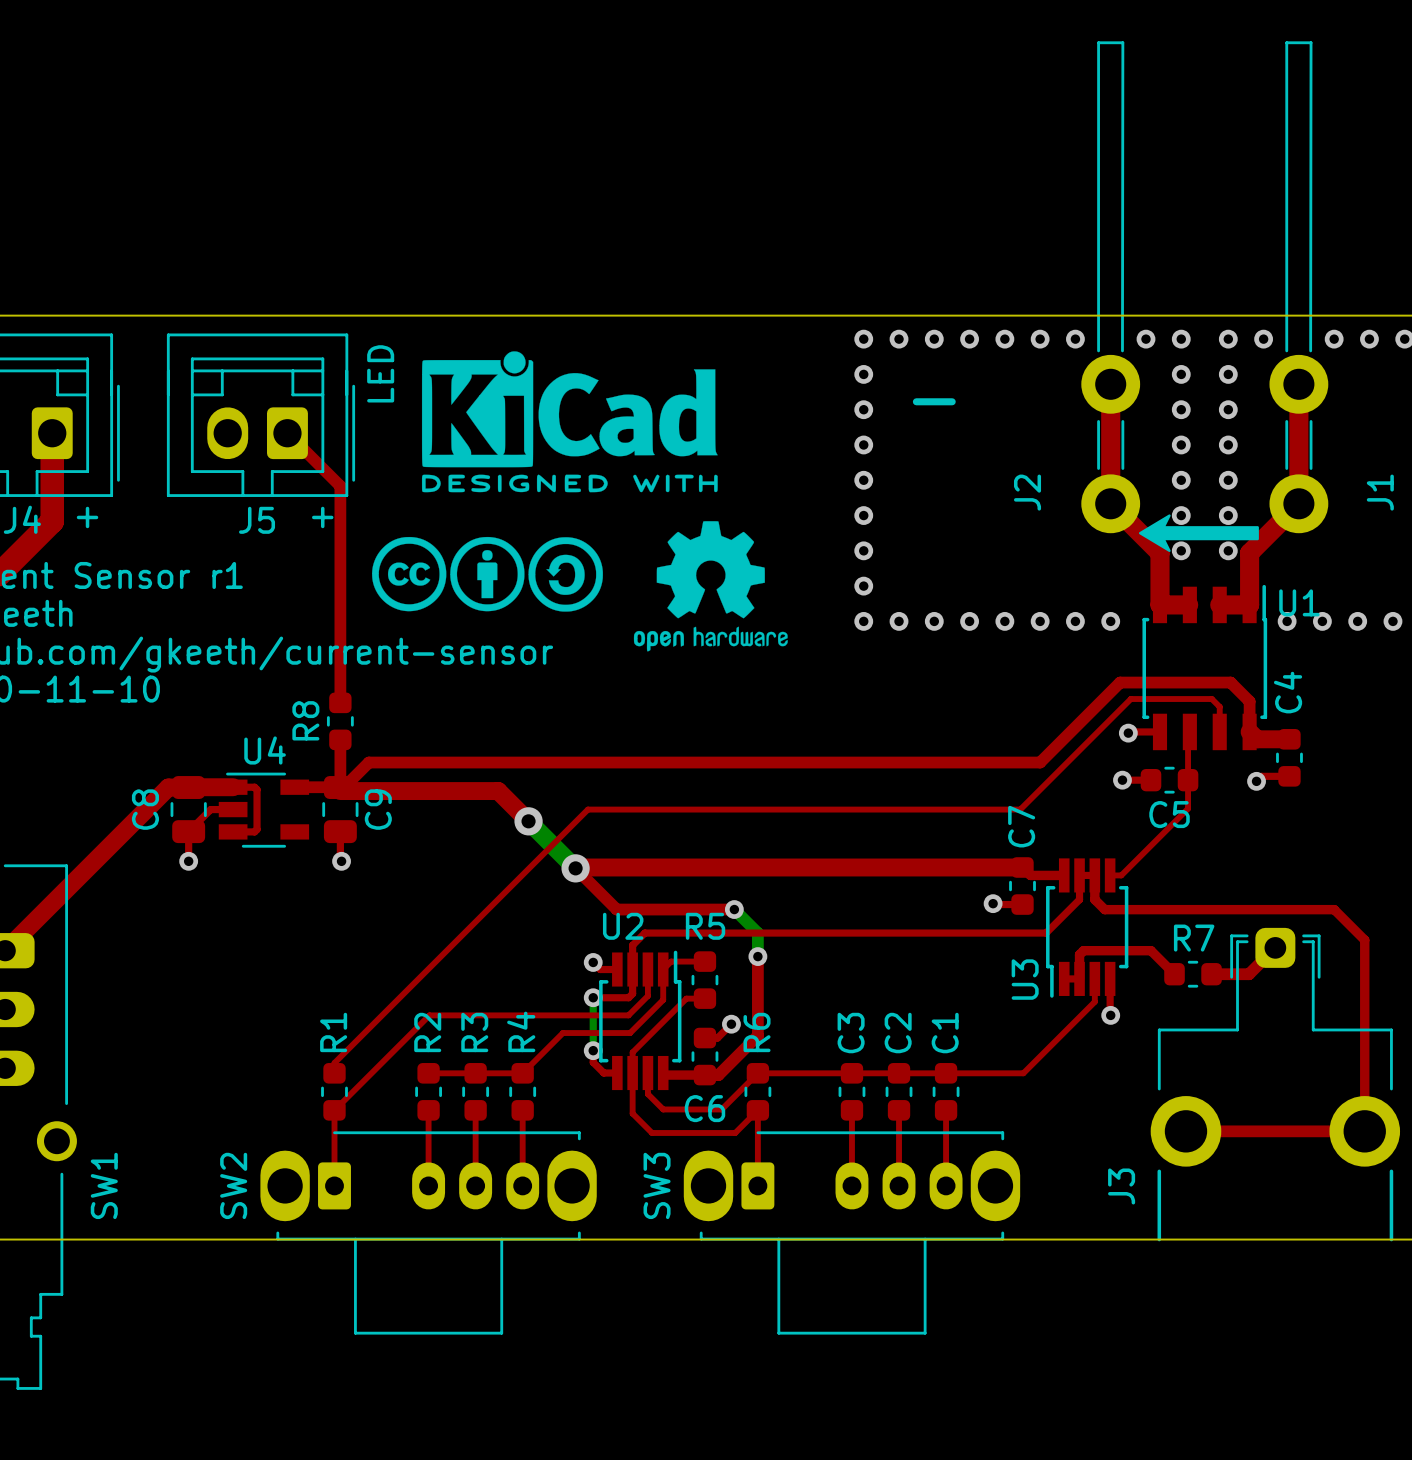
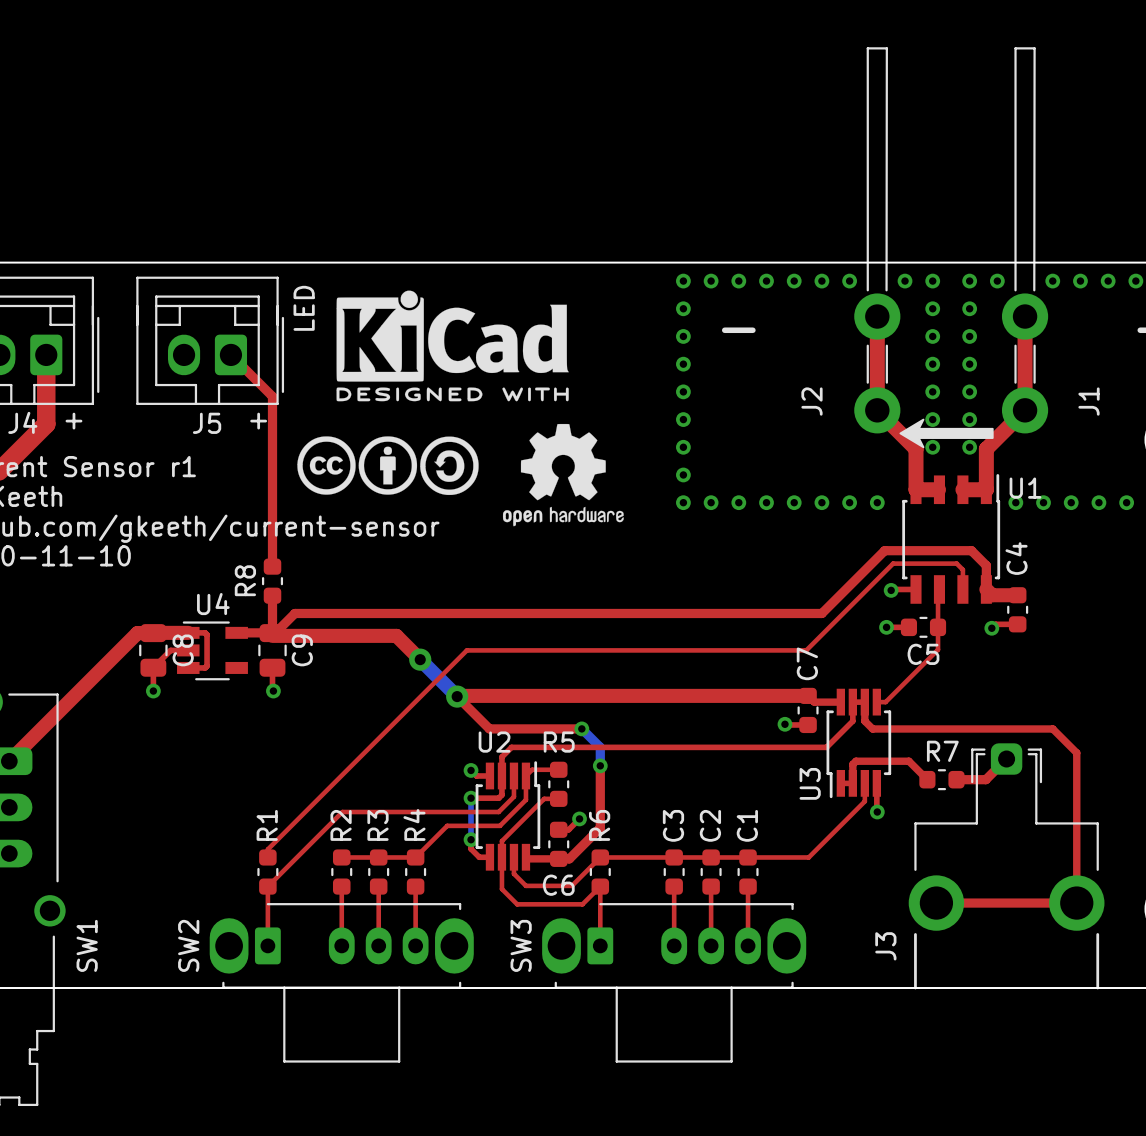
C8 name position: C8 (145, 809) -> C8 (183, 650)

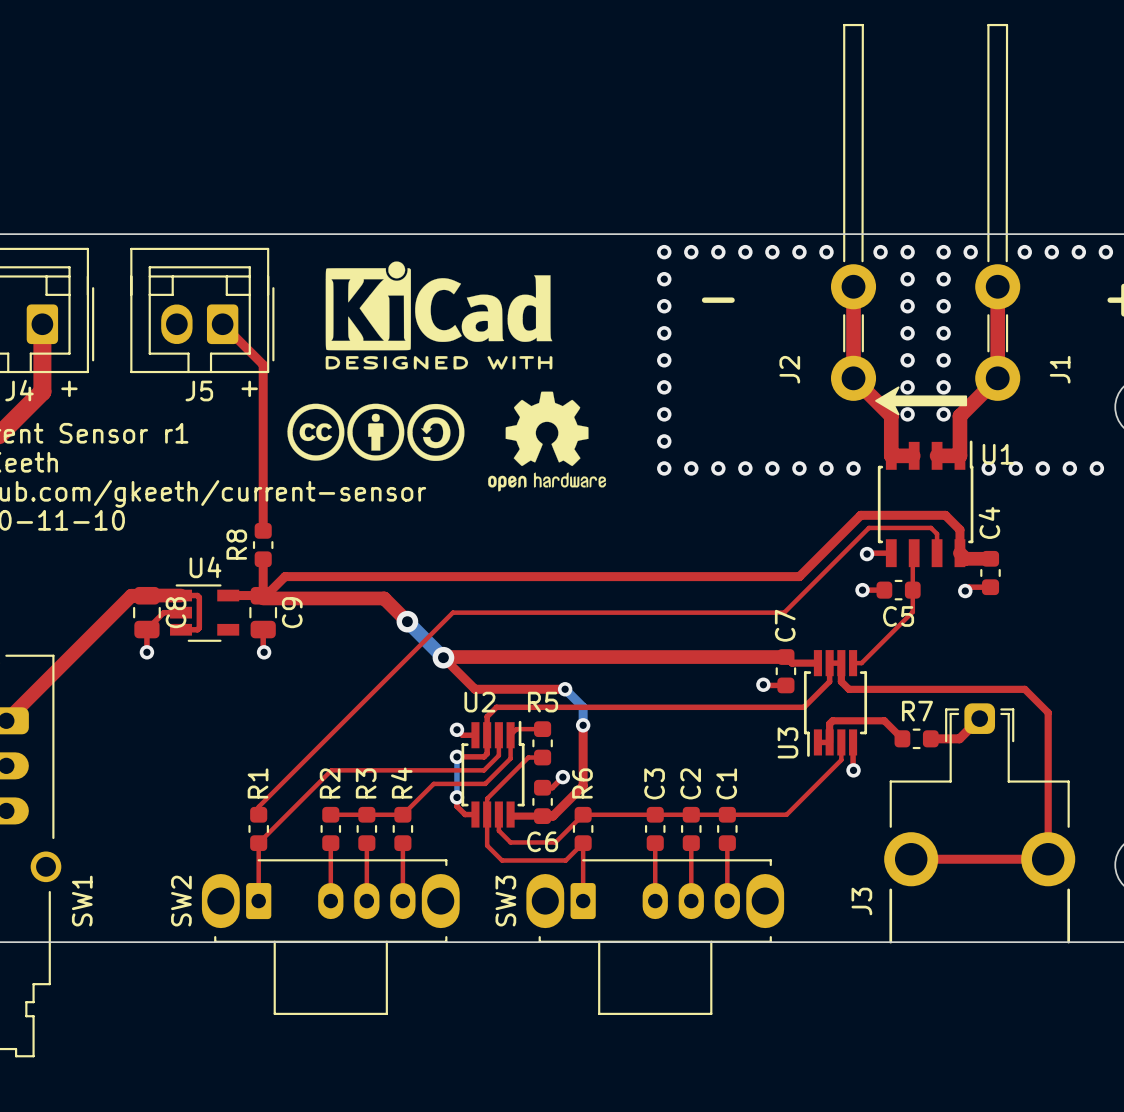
J5 text: LED (304, 308) -> none

